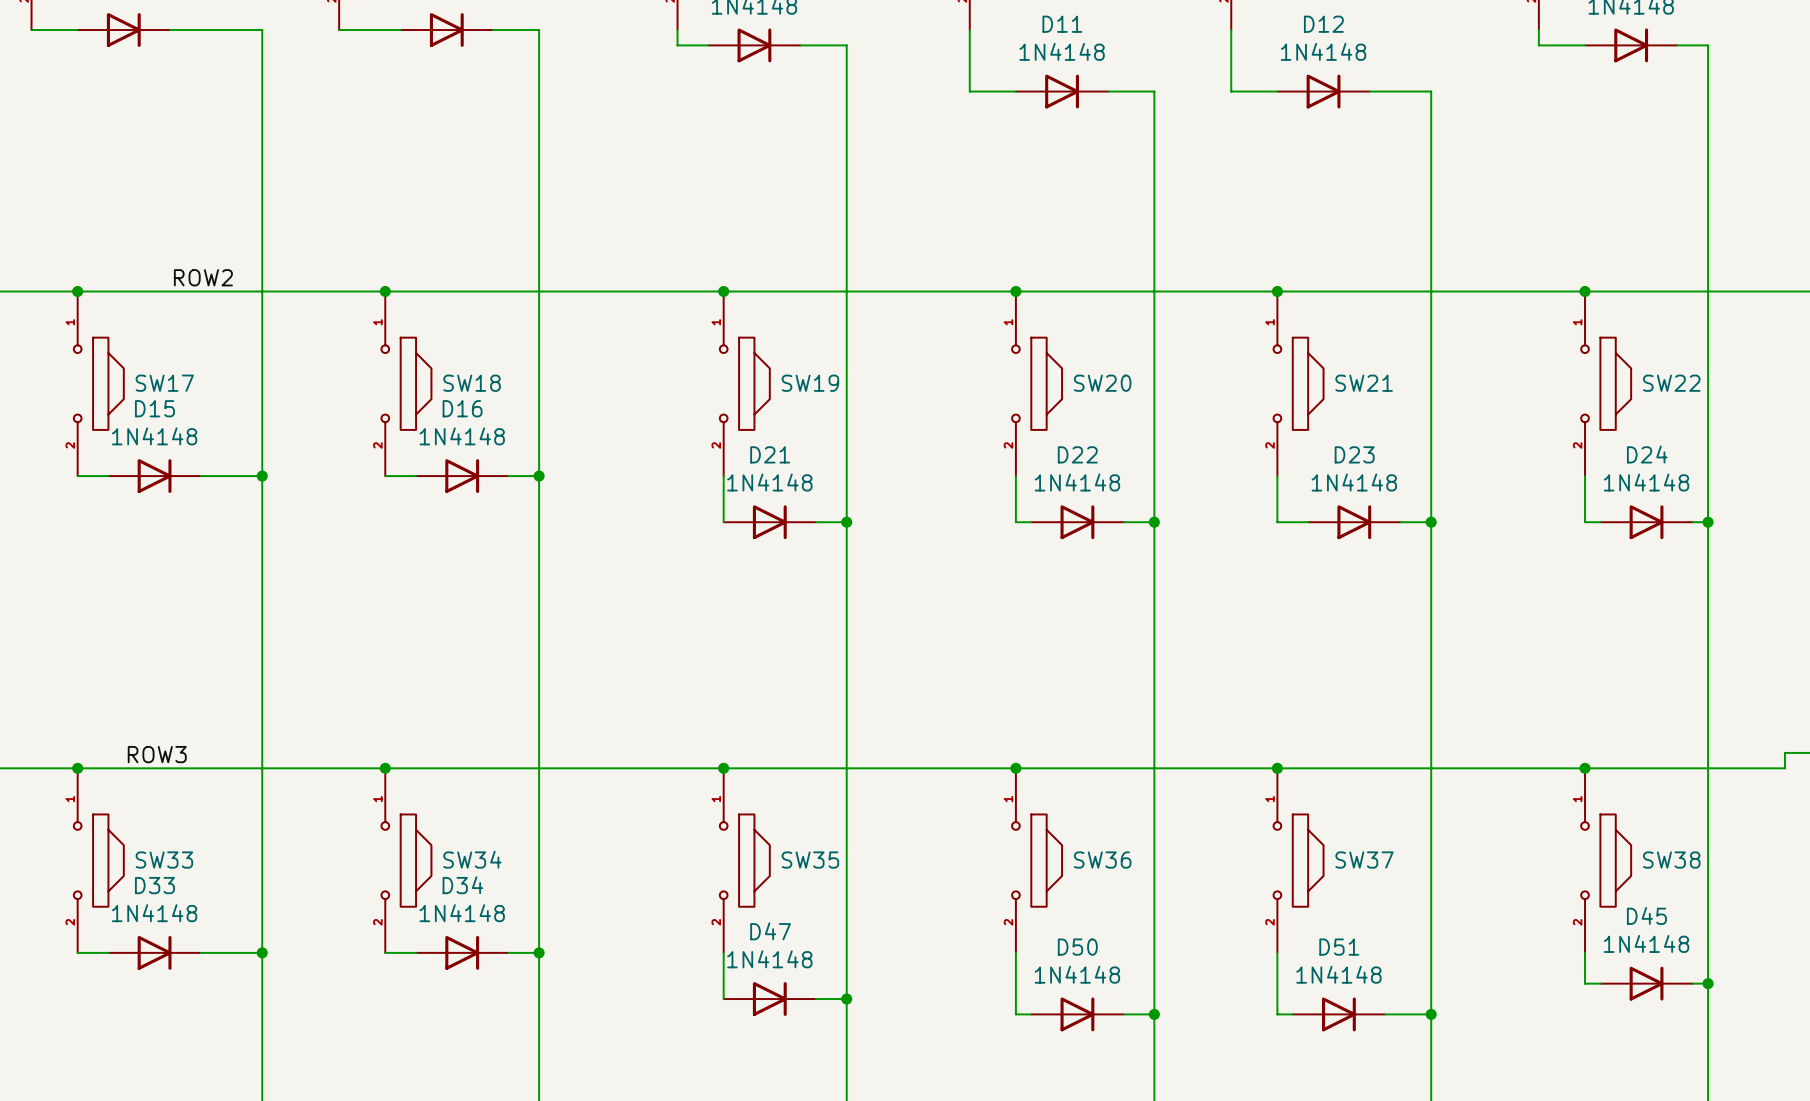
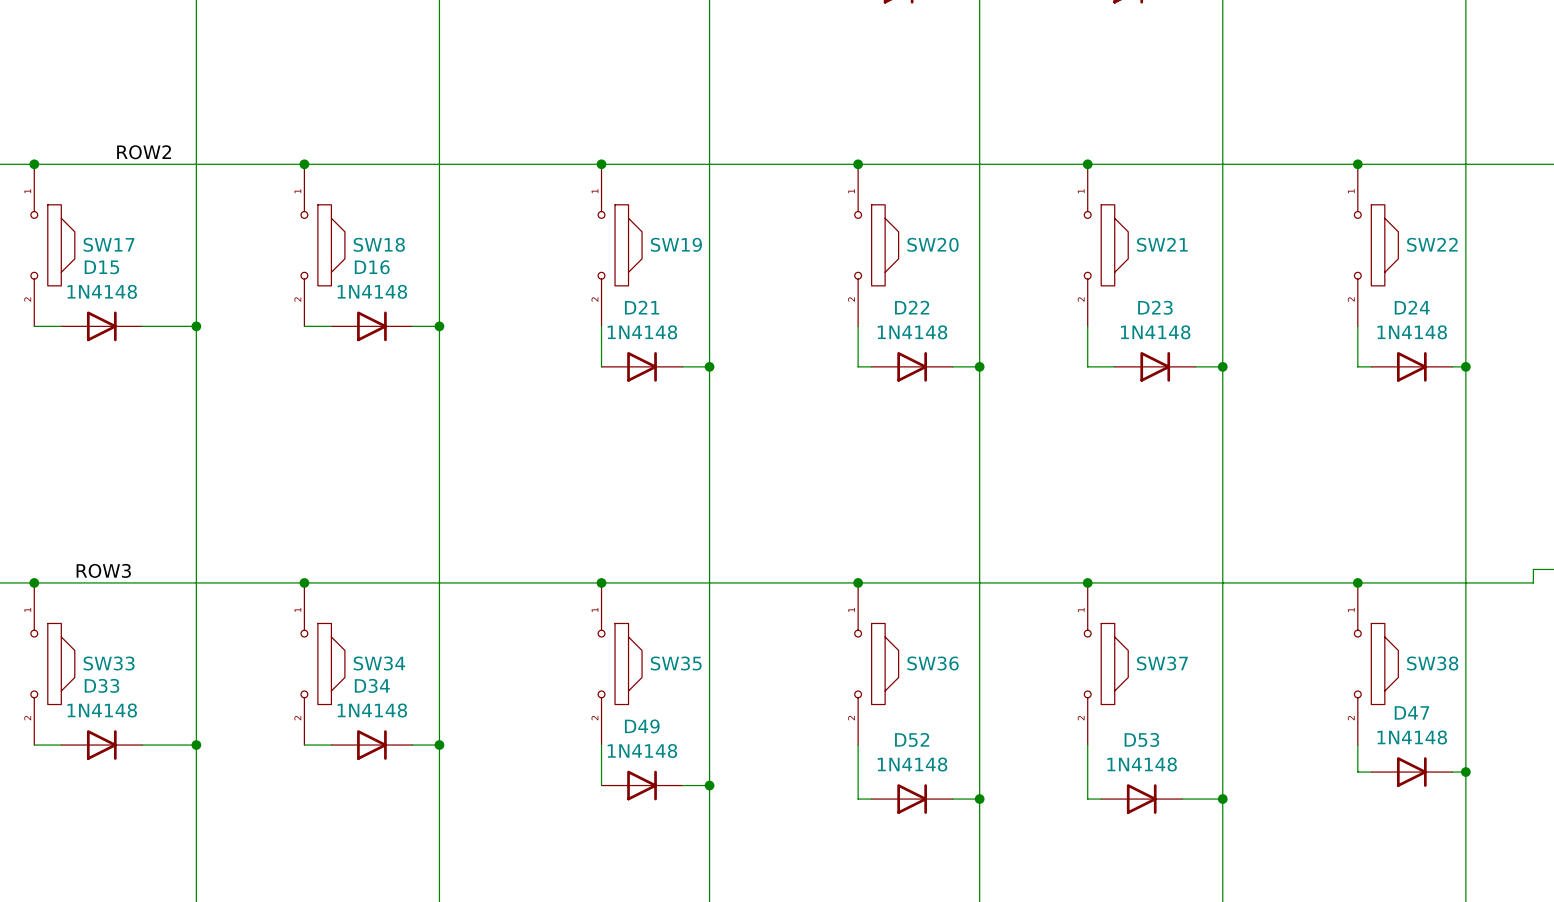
D45 name: D45 (1646, 915) -> D47 (1411, 712)
D47 name: D47 (770, 931) -> D49 (642, 726)
D50 name: D50 (1077, 947) -> D52 (912, 739)
D51 name: D51 (1339, 947) -> D53 (1141, 739)

